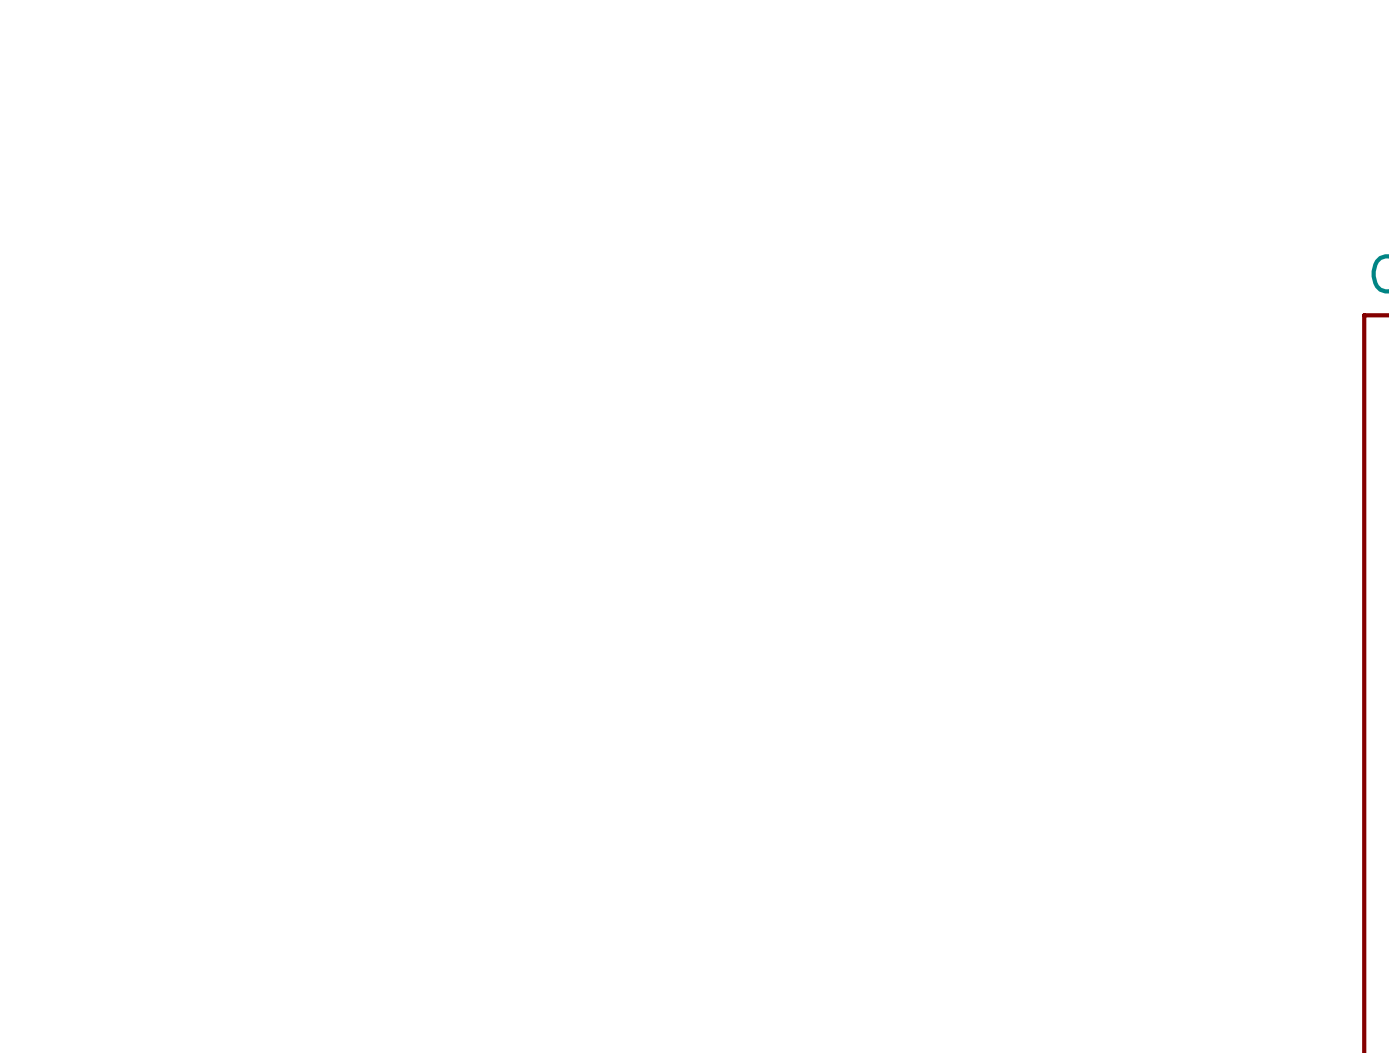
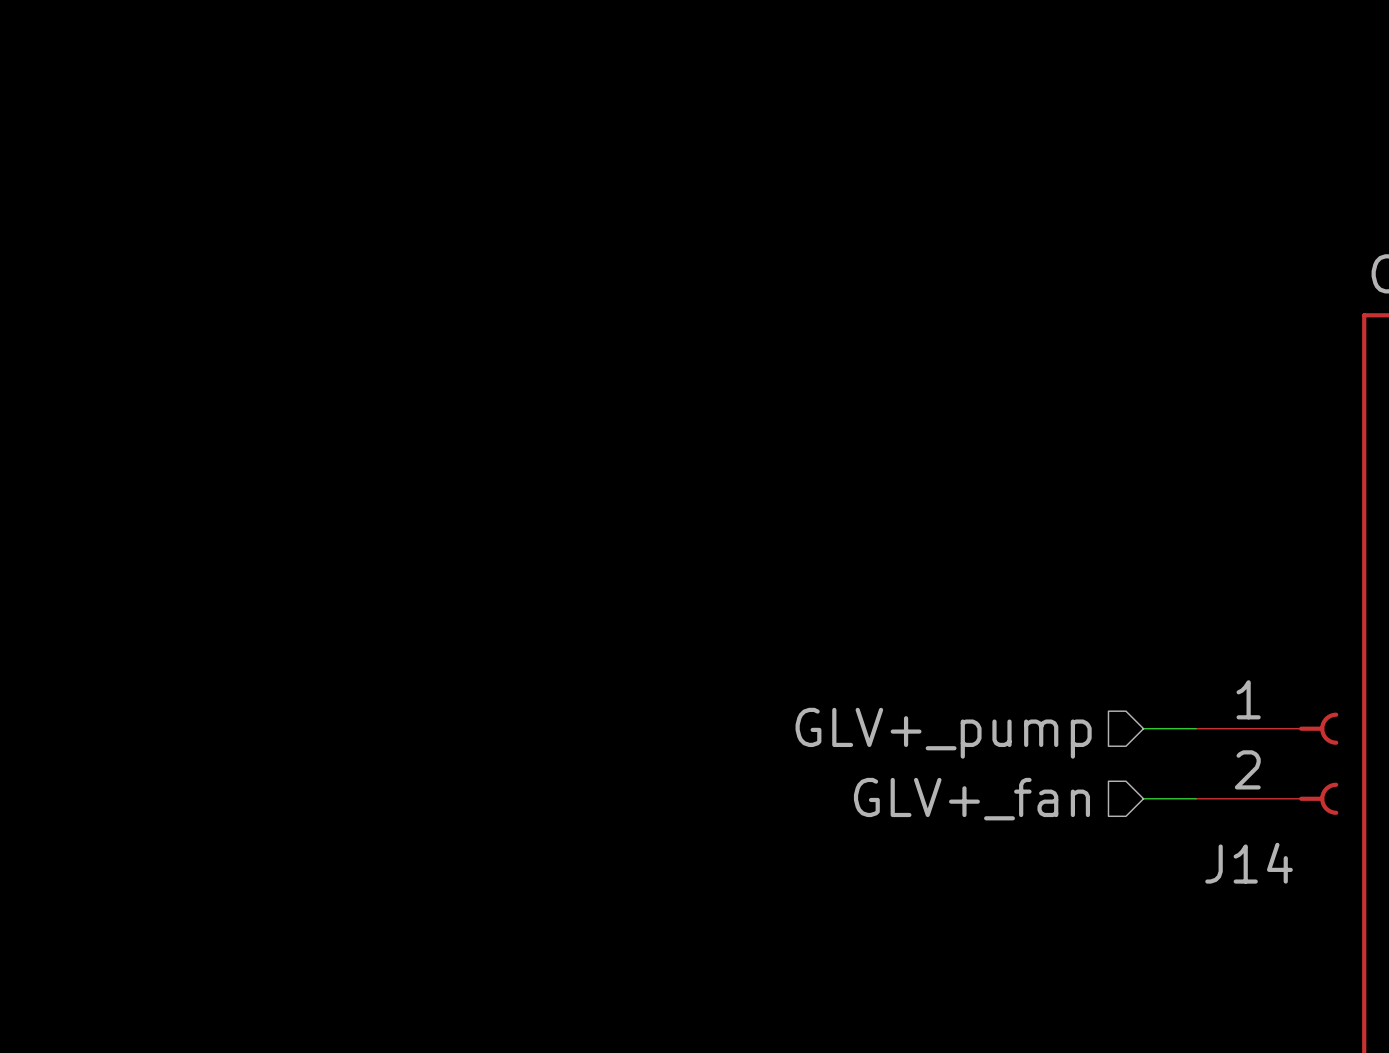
wire: none -> (1143, 728) (1196, 728)
sheet pin: none -> GLV+_pump (943, 733)
J14: none -> (1267, 763)
wire: none -> (1143, 798) (1196, 798)
sheet pin: none -> GLV+_fan (971, 799)

